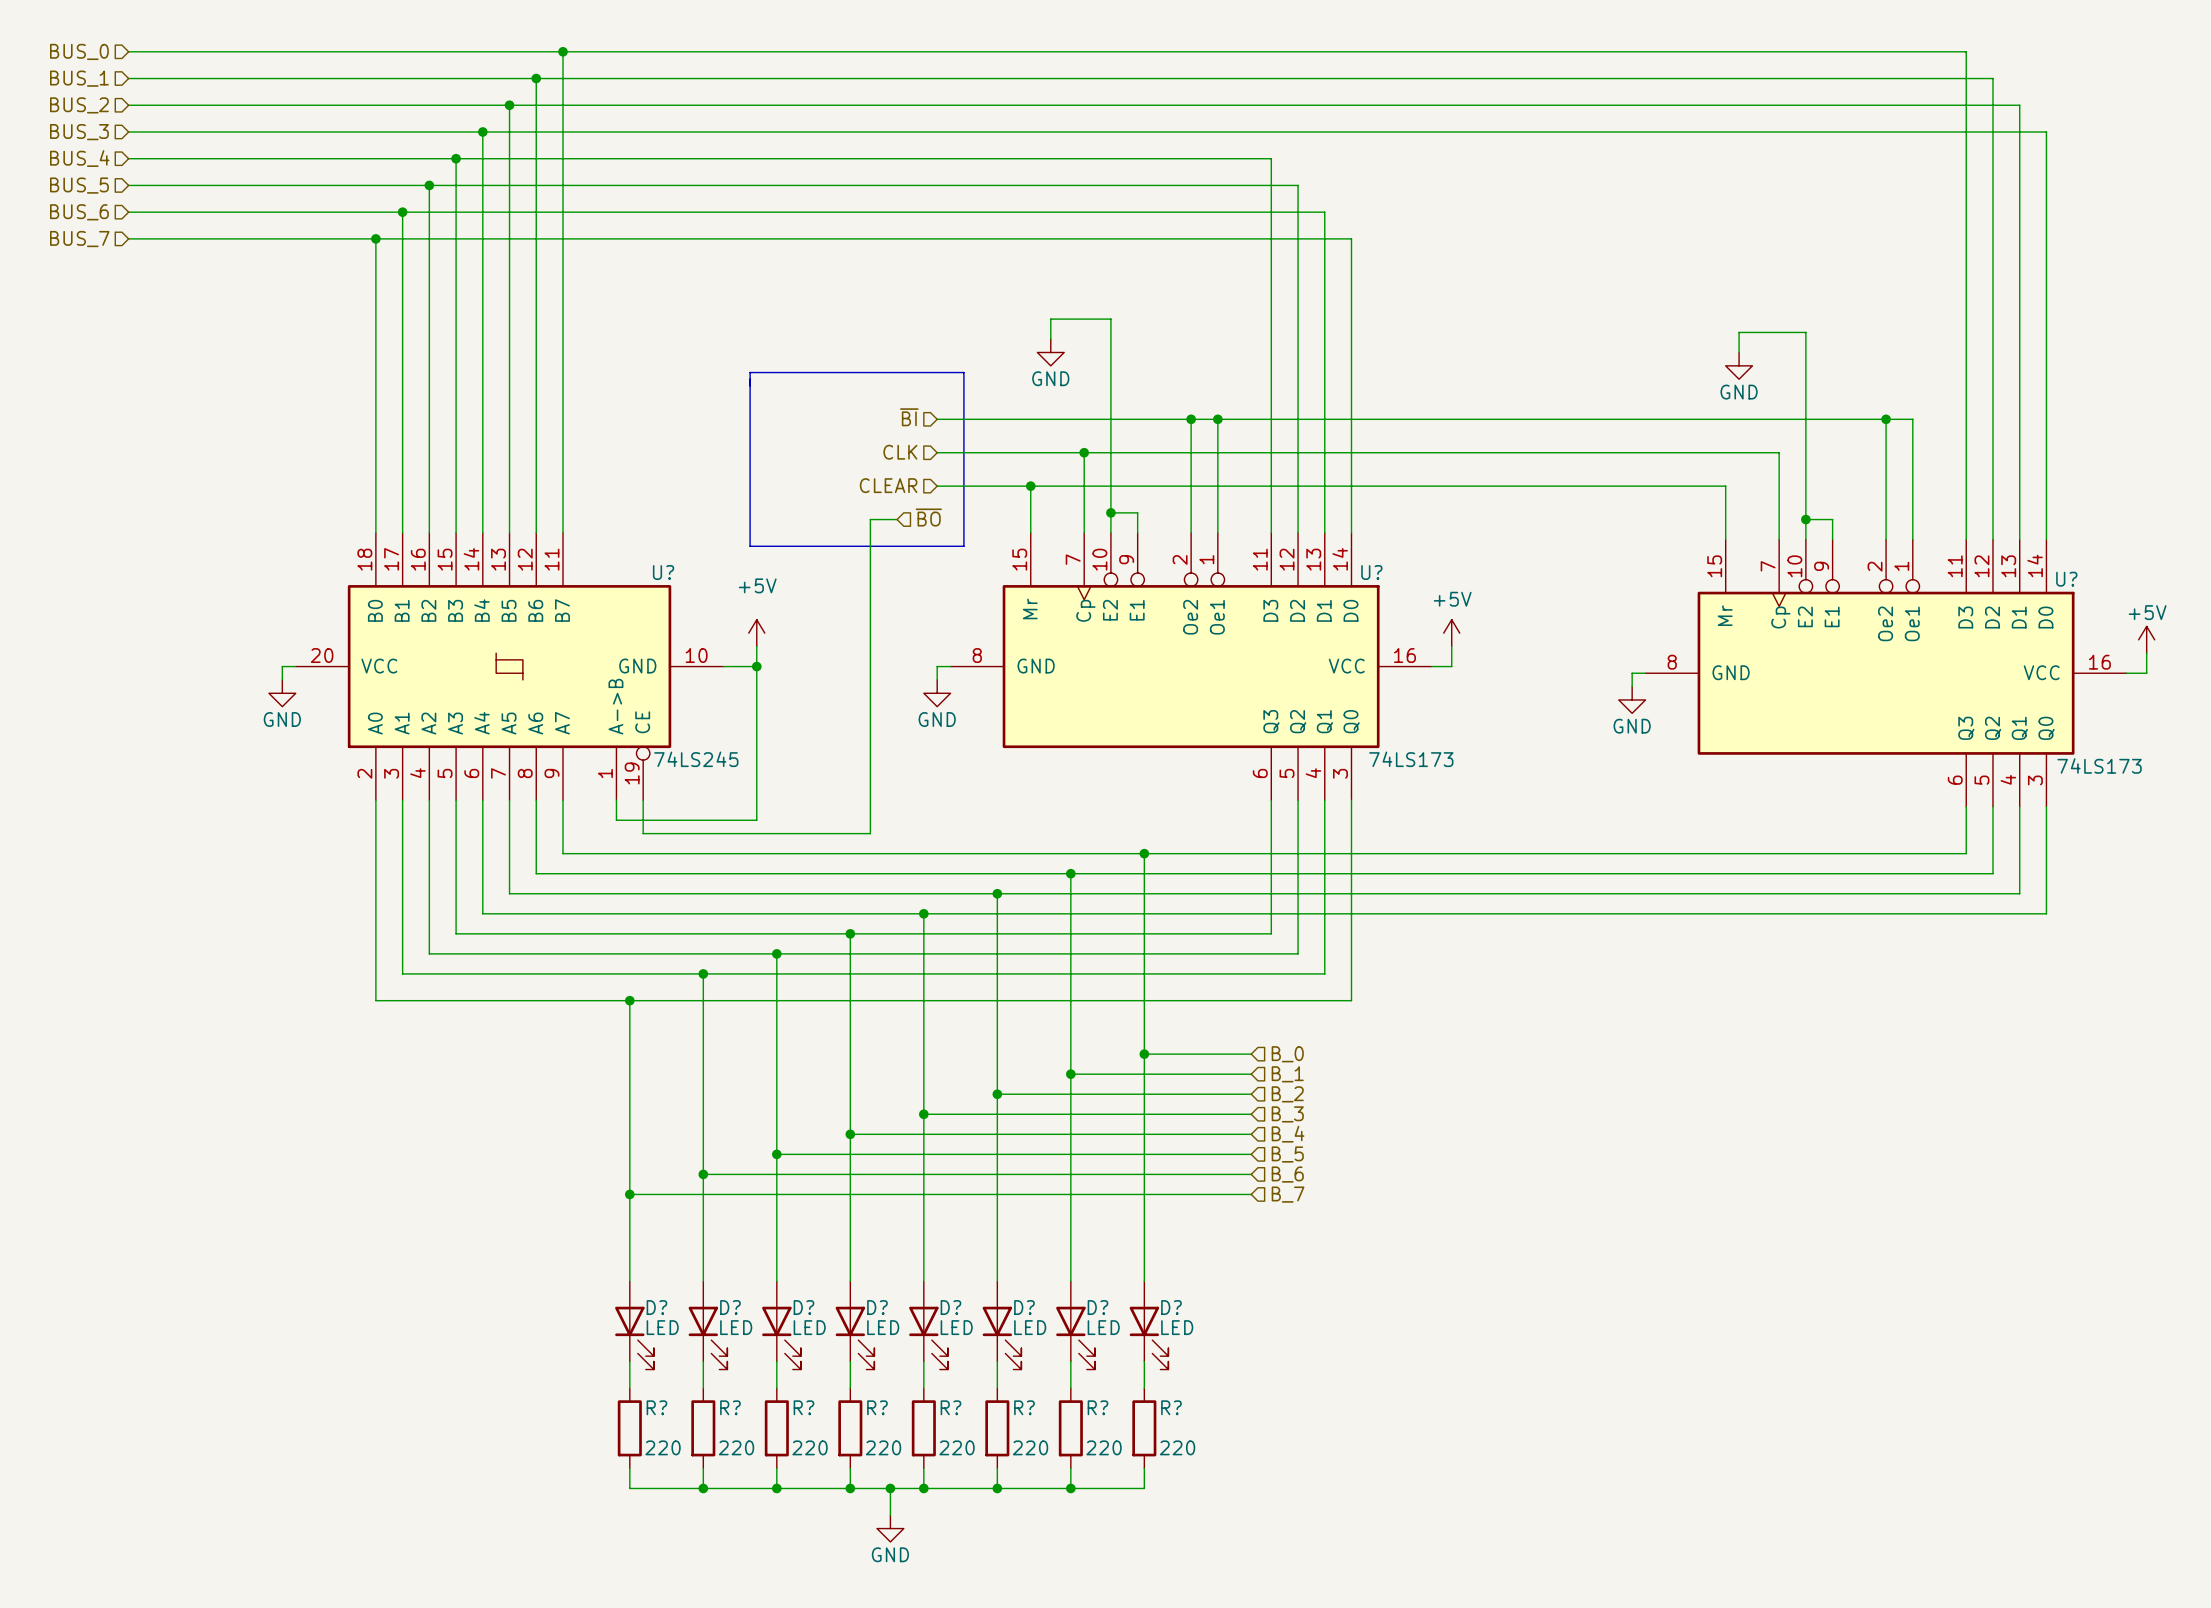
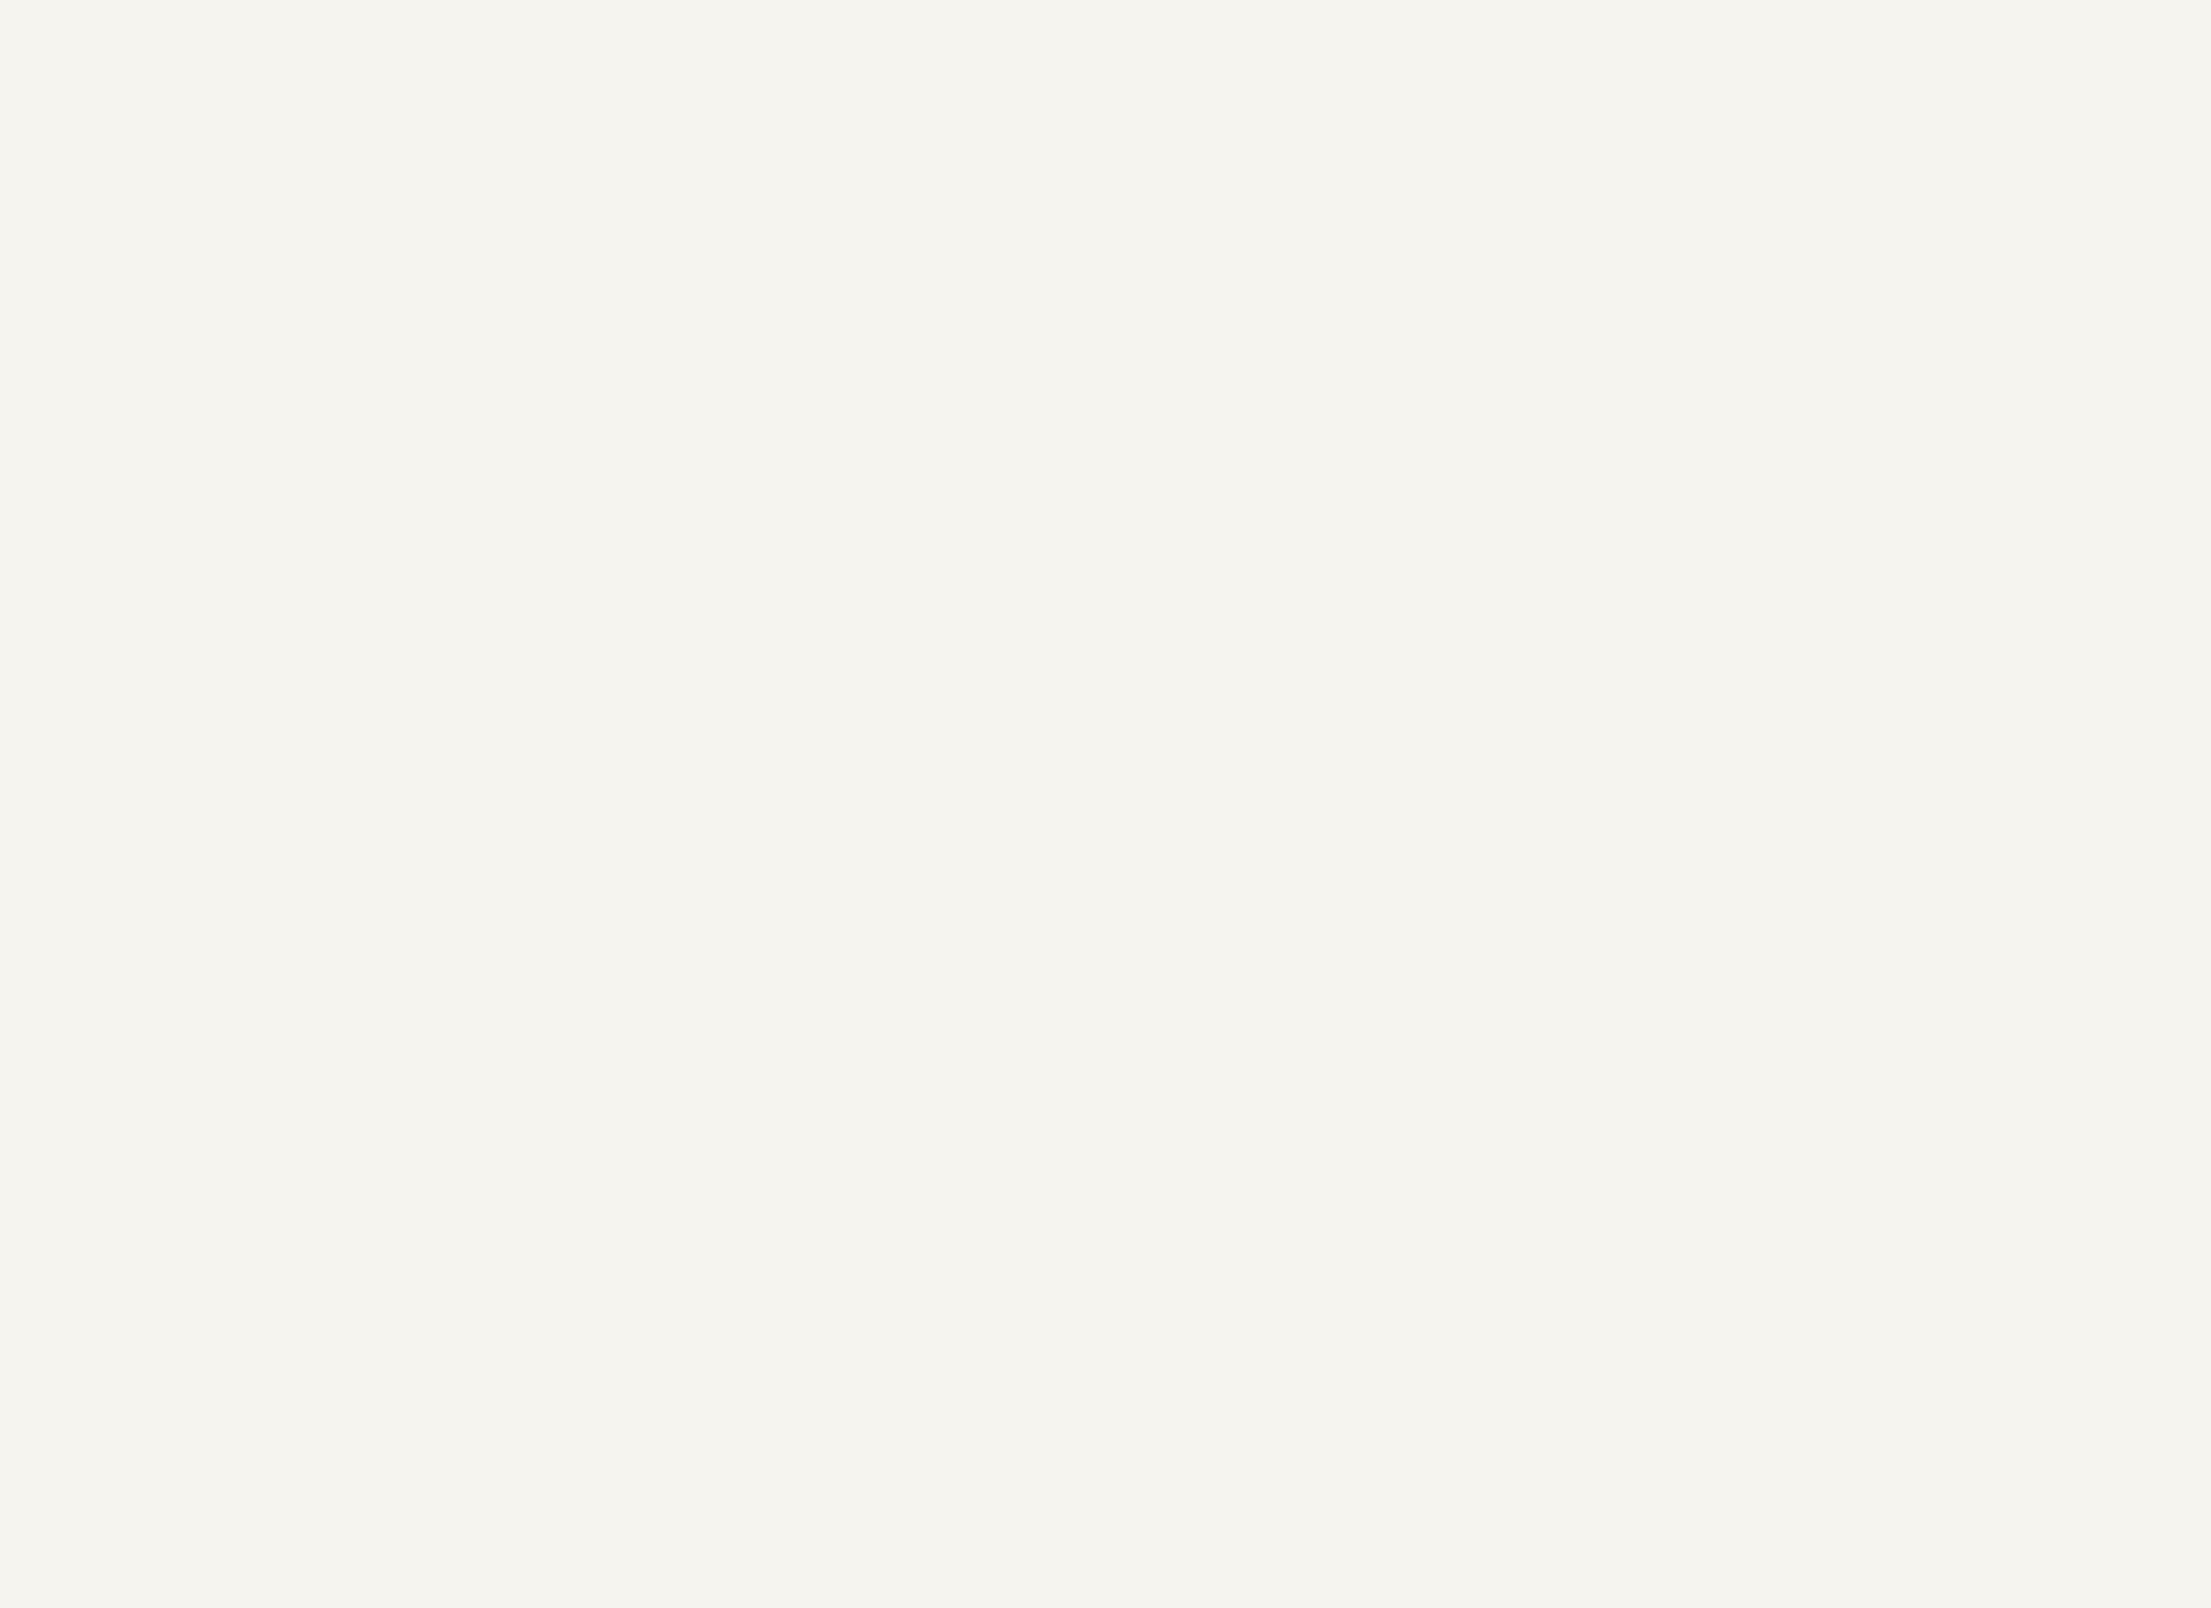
hierarchical label: BUS_0 (79, 51) -> none
wire: (128, 51) (1966, 51) (1966, 539) -> none
wire: (562, 51) (562, 532) -> none
junction: (562, 51) -> none
hierarchical label: BUS_1 (79, 78) -> none
wire: (128, 78) (1992, 78) (1992, 539) -> none
wire: (536, 78) (536, 532) -> none
junction: (536, 78) -> none
hierarchical label: BUS_2 (79, 105) -> none
wire: (128, 105) (2019, 105) (2019, 539) -> none
wire: (509, 105) (509, 532) -> none
junction: (509, 105) -> none
wire: (128, 131) (2046, 131) (2046, 539) -> none
wire: (482, 131) (482, 532) -> none
junction: (482, 131) -> none
hierarchical label: BUS_3 (79, 132) -> none
hierarchical label: BUS_4 (79, 158) -> none
wire: (128, 158) (1271, 158) (1271, 532) -> none
wire: (456, 158) (456, 532) -> none
junction: (456, 158) -> none
hierarchical label: BUS_5 (79, 185) -> none
wire: (128, 185) (1298, 185) (1298, 532) -> none
wire: (429, 185) (429, 532) -> none
junction: (429, 185) -> none
hierarchical label: BUS_6 (79, 212) -> none
wire: (128, 212) (1324, 212) (1324, 532) -> none
wire: (402, 212) (402, 532) -> none
junction: (402, 212) -> none
wire: (128, 238) (1351, 238) (1351, 532) -> none
wire: (375, 238) (375, 532) -> none
junction: (375, 238) -> none
hierarchical label: BUS_7 (79, 239) -> none
wire: (1050, 339) (1050, 319) (1110, 319) (1110, 532) -> none
power symbol: GND (1050, 352) -> none
wire: (1739, 352) (1739, 332) (1805, 332) (1805, 539) -> none
power symbol: GND (1739, 365) -> none
line: (750, 372) (750, 546) (963, 546) (963, 372) (750, 372) -> none
hierarchical label: ~{BI} (909, 417) -> none
wire: (937, 419) (1912, 419) (1912, 539) -> none
wire: (1191, 419) (1191, 532) -> none
junction: (1191, 419) -> none
wire: (1217, 419) (1217, 532) -> none
junction: (1217, 419) -> none
wire: (1886, 419) (1886, 539) -> none
junction: (1886, 419) -> none
hierarchical label: CLK (900, 452) -> none
wire: (937, 452) (1779, 452) (1779, 539) -> none
wire: (1084, 452) (1084, 532) -> none
junction: (1084, 452) -> none
hierarchical label: CLEAR (888, 485) -> none
wire: (937, 486) (1725, 486) (1725, 539) -> none
wire: (1030, 486) (1030, 532) -> none
junction: (1030, 486) -> none
wire: (1110, 512) (1137, 512) (1137, 532) -> none
junction: (1110, 512) -> none
hierarchical label: ~{BO} (928, 517) -> none
wire: (897, 519) (870, 519) (870, 833) (643, 833) (643, 800) -> none
wire: (1805, 519) (1832, 519) (1832, 539) -> none
junction: (1805, 519) -> none
power symbol: +5V (756, 633) -> none
power symbol: +5V (1451, 633) -> none
power symbol: +5V (2146, 639) -> none
wire: (756, 646) (756, 820) (616, 820) (616, 800) -> none
wire: (1451, 646) (1451, 666) (1431, 666) -> none
wire: (2146, 653) (2146, 673) (2126, 673) -> none
wire: (295, 666) (282, 666) (282, 679) -> none
U?: 74LS245 (509, 666) -> none
wire: (723, 666) (756, 666) -> none
junction: (756, 666) -> none
wire: (950, 666) (937, 666) (937, 679) -> none
U?: 74LS173 (1191, 666) -> none
wire: (1645, 673) (1632, 673) (1632, 686) -> none
U?: 74LS173 (1886, 673) -> none
power symbol: GND (282, 693) -> none
power symbol: GND (937, 693) -> none
power symbol: GND (1632, 699) -> none
wire: (375, 800) (375, 1000) (1351, 1000) (1351, 800) -> none
wire: (402, 800) (402, 973) (1324, 973) (1324, 800) -> none
wire: (429, 800) (429, 953) (1298, 953) (1298, 800) -> none
wire: (456, 800) (456, 933) (1271, 933) (1271, 800) -> none
wire: (482, 800) (482, 913) (2046, 913) (2046, 806) -> none
wire: (509, 800) (509, 893) (2019, 893) (2019, 806) -> none
wire: (536, 800) (536, 873) (1992, 873) (1992, 806) -> none
wire: (562, 800) (562, 853) (1966, 853) (1966, 806) -> none
wire: (1144, 853) (1144, 1281) -> none
junction: (1144, 853) -> none
wire: (1070, 873) (1070, 1281) -> none
junction: (1070, 873) -> none
wire: (997, 893) (997, 1094) -> none
junction: (997, 893) -> none
wire: (923, 913) (923, 1281) -> none
junction: (923, 913) -> none
wire: (850, 933) (850, 1134) -> none
junction: (850, 933) -> none
wire: (776, 953) (776, 1281) -> none
junction: (776, 953) -> none
wire: (703, 973) (703, 1281) -> none
junction: (703, 973) -> none
wire: (629, 1000) (629, 1281) -> none
junction: (629, 1000) -> none
wire: (1144, 1054) (1251, 1054) -> none
junction: (1144, 1054) -> none
hierarchical label: B_0 (1287, 1054) -> none
wire: (1070, 1074) (1251, 1074) -> none
junction: (1070, 1074) -> none
hierarchical label: B_1 (1287, 1074) -> none
wire: (997, 1094) (1251, 1094) -> none
wire: (997, 1094) (997, 1281) -> none
junction: (997, 1094) -> none
hierarchical label: B_2 (1287, 1094) -> none
wire: (923, 1114) (1251, 1114) -> none
junction: (923, 1114) -> none
hierarchical label: B_3 (1287, 1114) -> none
wire: (850, 1134) (850, 1281) -> none
wire: (850, 1134) (1251, 1134) -> none
junction: (850, 1134) -> none
hierarchical label: B_4 (1288, 1134) -> none
wire: (776, 1154) (1251, 1154) -> none
junction: (776, 1154) -> none
hierarchical label: B_5 (1287, 1154) -> none
wire: (703, 1174) (1251, 1174) -> none
junction: (703, 1174) -> none
hierarchical label: B_6 (1287, 1174) -> none
wire: (629, 1194) (1251, 1194) -> none
junction: (629, 1194) -> none
hierarchical label: B_7 (1288, 1194) -> none
D?: LED (634, 1325) -> none
D?: LED (707, 1325) -> none
D?: LED (781, 1325) -> none
D?: LED (855, 1325) -> none
D?: LED (928, 1325) -> none
D?: LED (1002, 1325) -> none
D?: LED (1075, 1325) -> none
D?: LED (1149, 1325) -> none
wire: (629, 1361) (629, 1388) -> none
wire: (703, 1361) (703, 1388) -> none
wire: (776, 1361) (776, 1388) -> none
wire: (850, 1361) (850, 1388) -> none
wire: (923, 1361) (923, 1388) -> none
wire: (997, 1361) (997, 1388) -> none
wire: (1070, 1361) (1070, 1388) -> none
wire: (1144, 1361) (1144, 1388) -> none
R?: 220 (629, 1428) -> none
R?: 220 (703, 1428) -> none
R?: 220 (776, 1428) -> none
R?: 220 (850, 1428) -> none
R?: 220 (923, 1428) -> none
R?: 220 (997, 1428) -> none
R?: 220 (1070, 1428) -> none
R?: 220 (1144, 1428) -> none
wire: (629, 1468) (629, 1488) (1144, 1488) (1144, 1468) -> none
wire: (703, 1468) (703, 1488) -> none
wire: (776, 1468) (776, 1488) -> none
wire: (850, 1468) (850, 1488) -> none
wire: (923, 1468) (923, 1488) -> none
wire: (997, 1468) (997, 1488) -> none
wire: (1070, 1468) (1070, 1488) -> none
junction: (703, 1488) -> none
junction: (776, 1488) -> none
junction: (850, 1488) -> none
wire: (890, 1488) (890, 1515) -> none
junction: (890, 1488) -> none
junction: (923, 1488) -> none
junction: (997, 1488) -> none
junction: (1070, 1488) -> none
power symbol: GND (890, 1528) -> none

